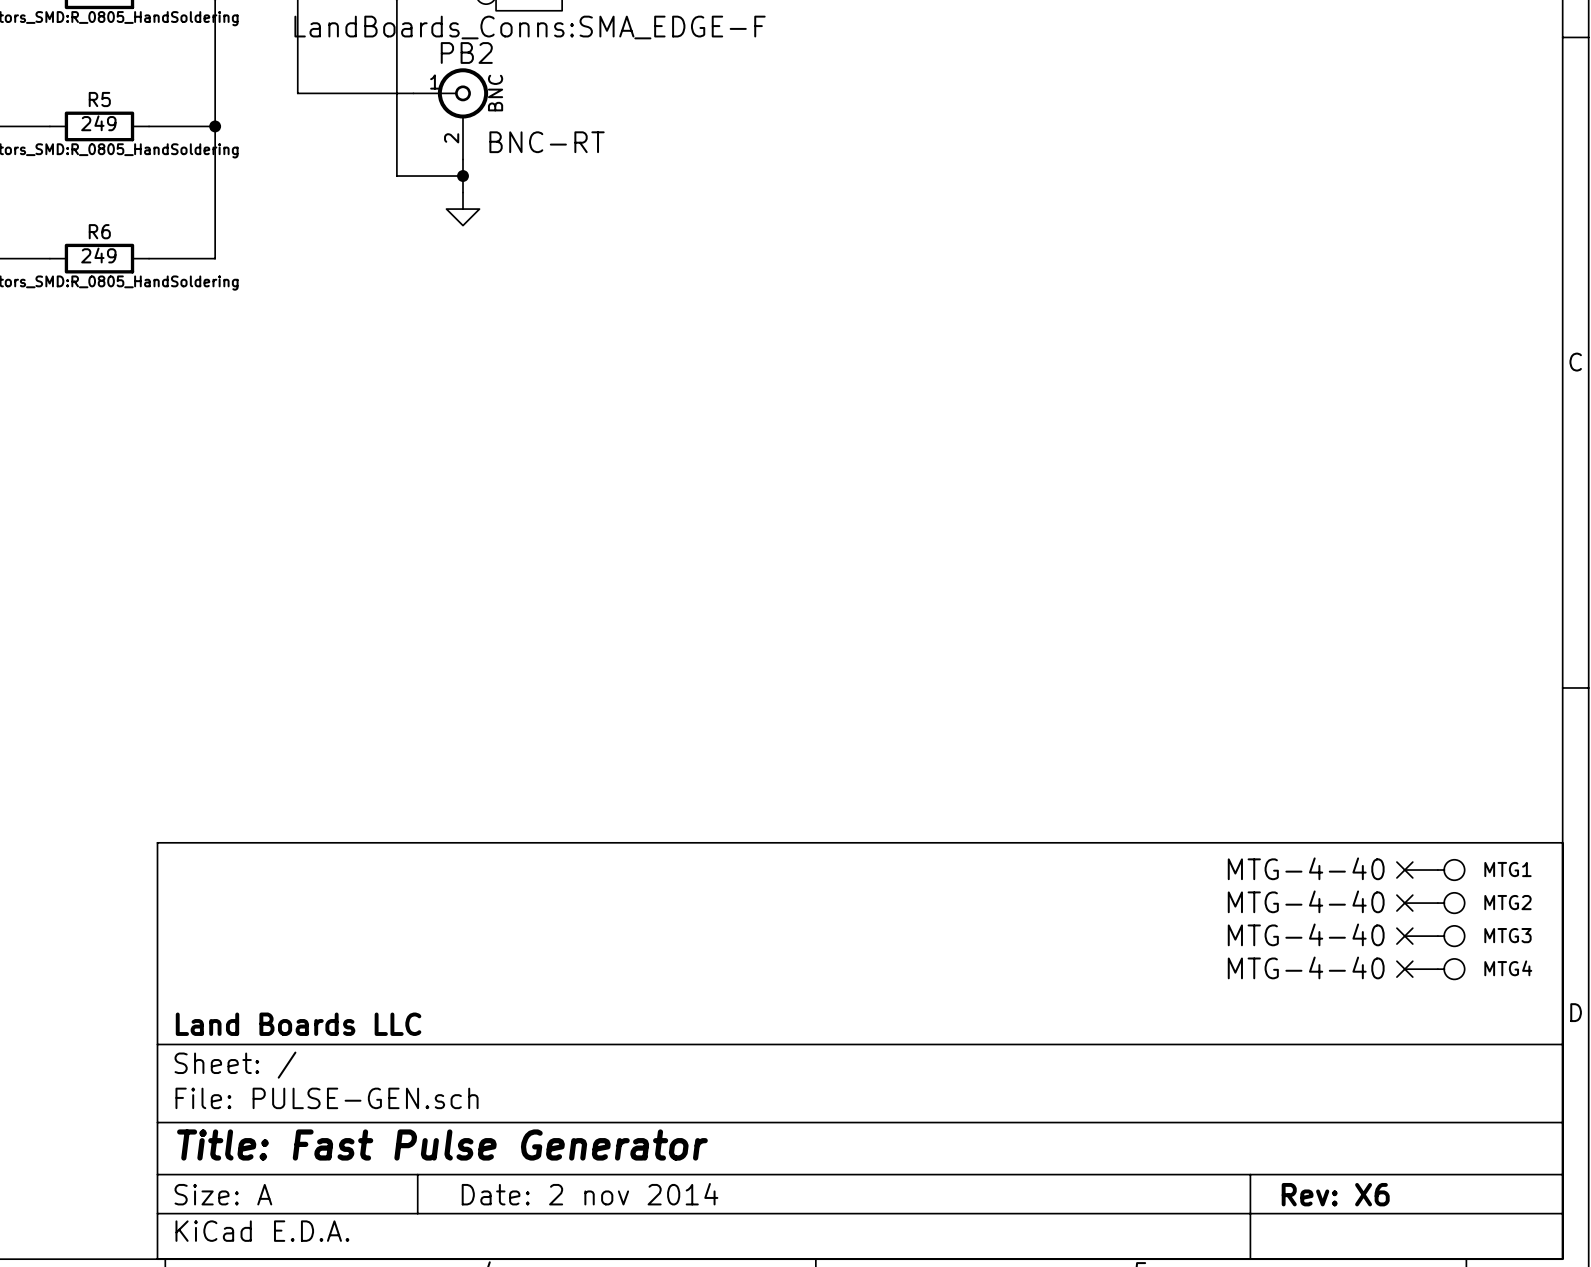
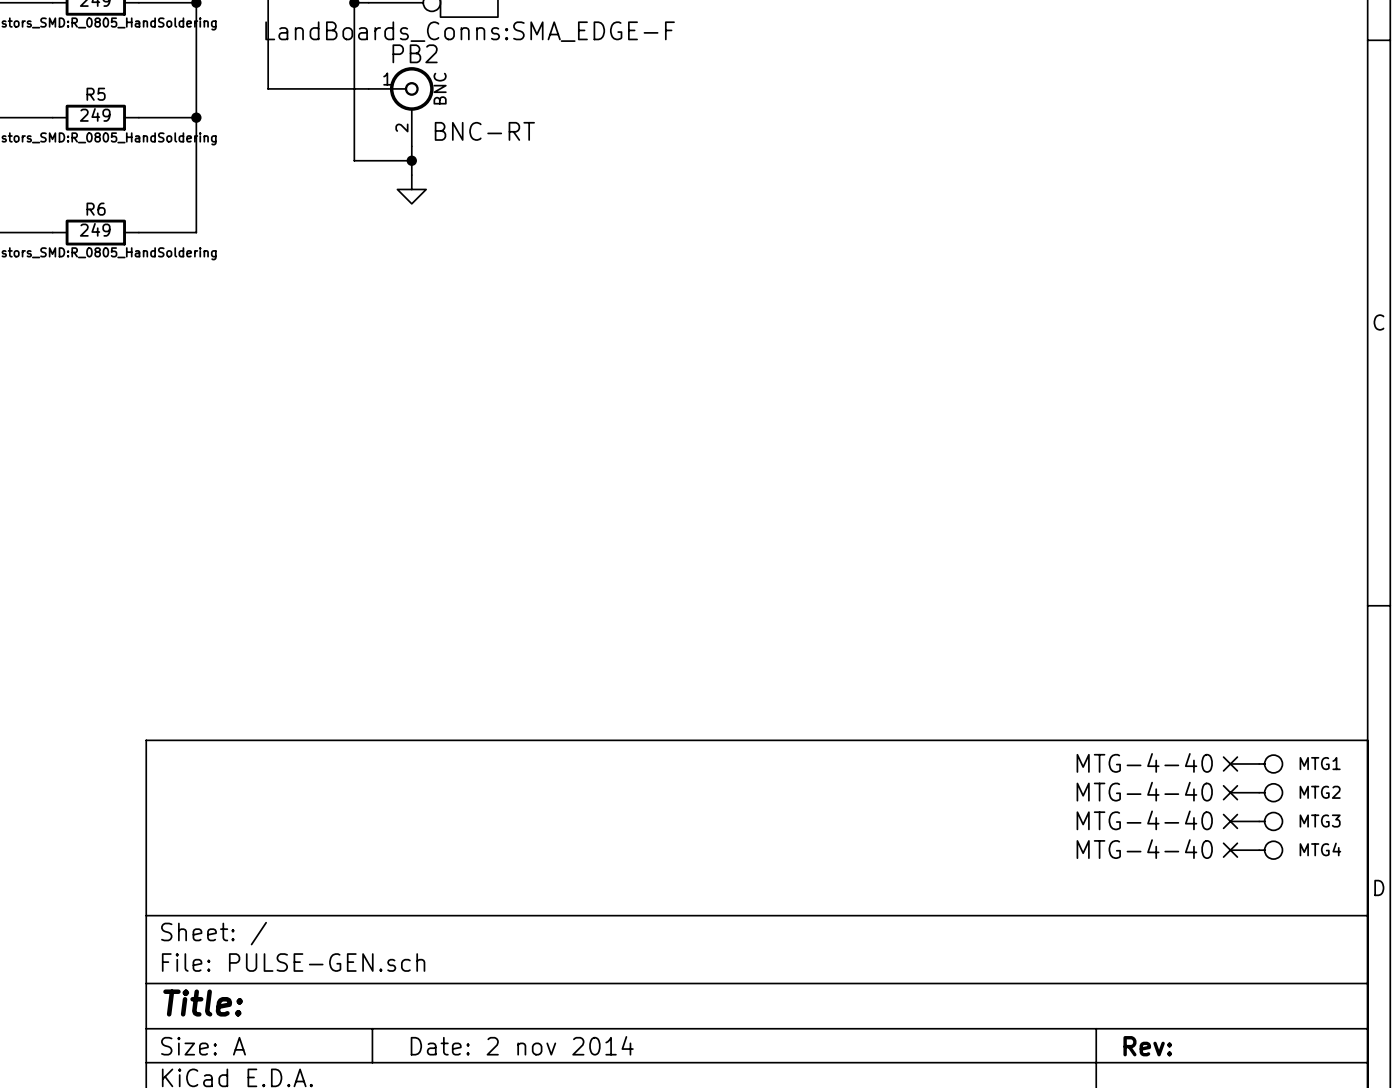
title block: Land Boards LLC (298, 1024) -> none
title block: Title: Fast Pulse Generator (442, 1144) -> Title: (203, 1003)
title block: Rev: X6 (1335, 1194) -> Rev: (1147, 1046)

